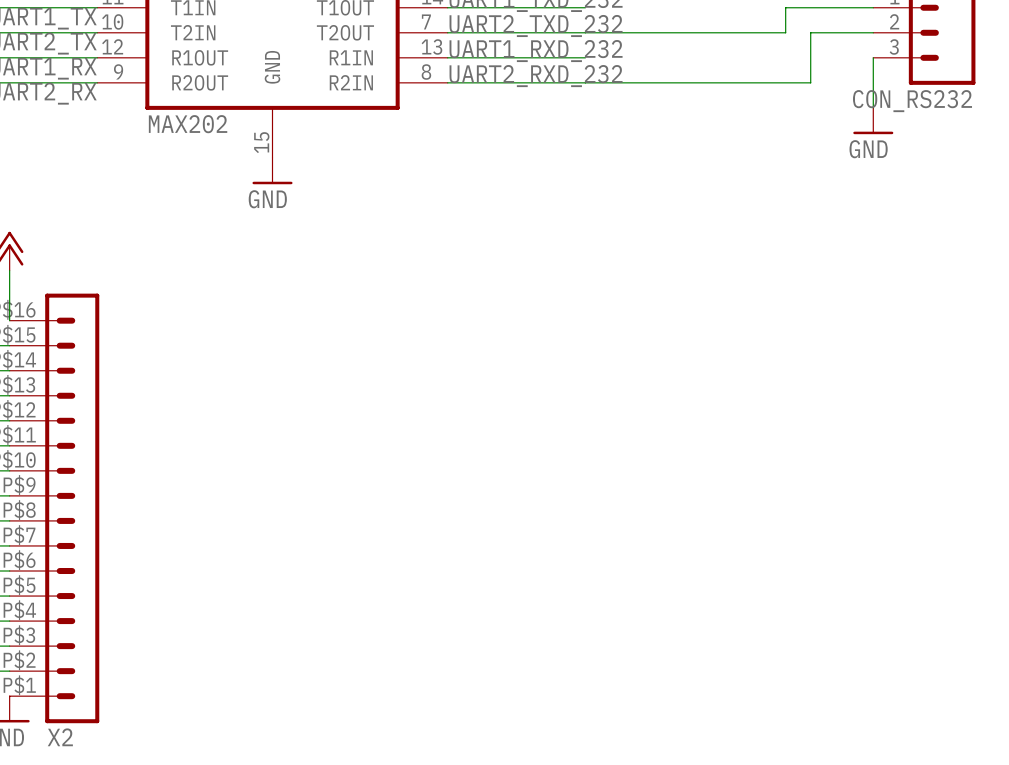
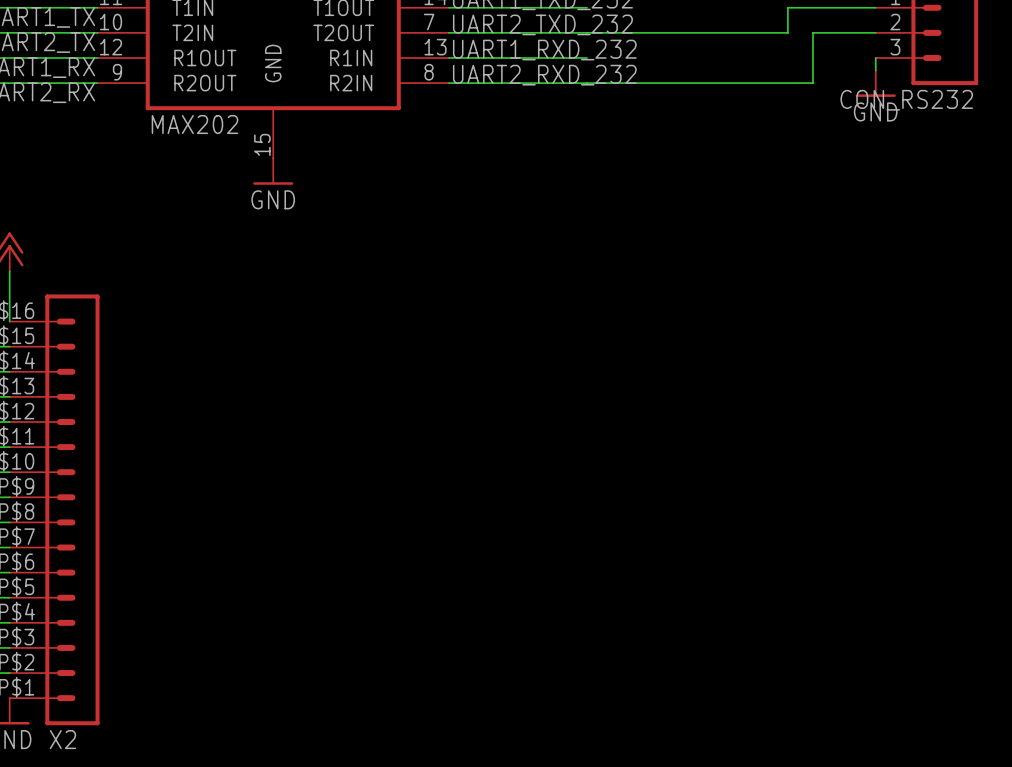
power symbol position: GND (873, 121) -> GND (875, 83)

